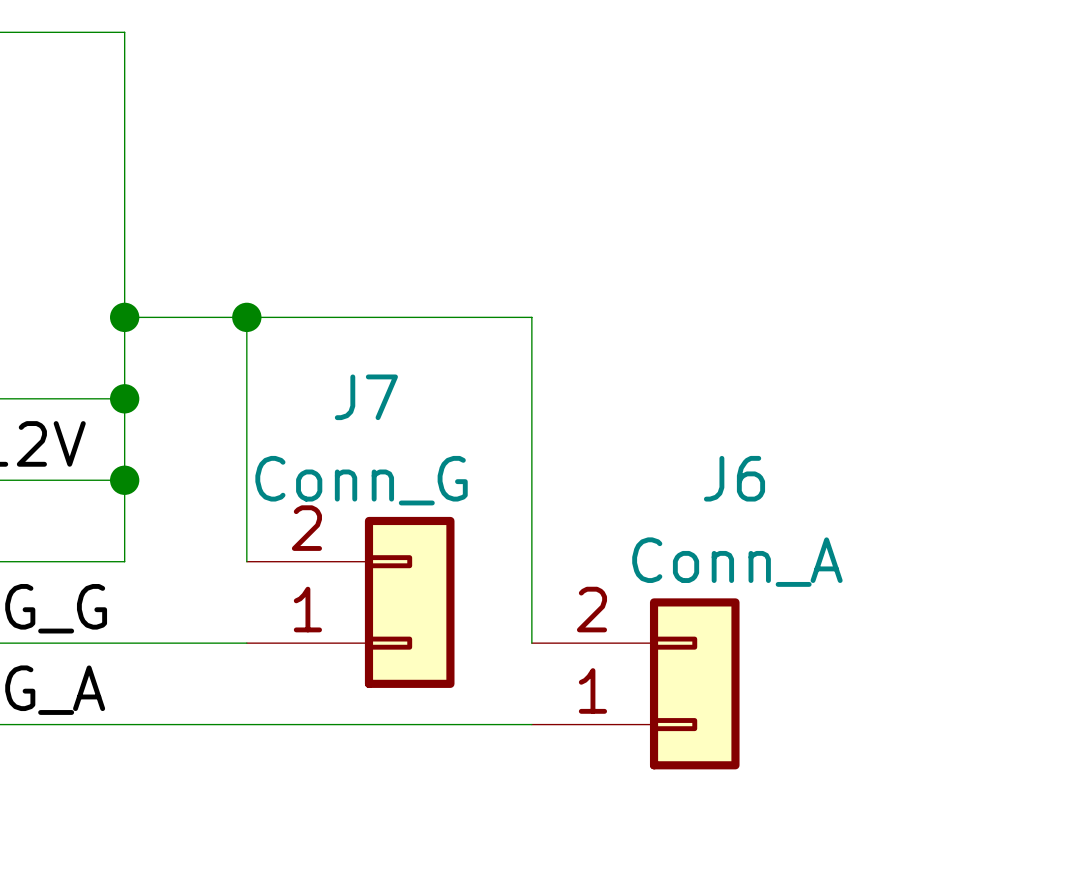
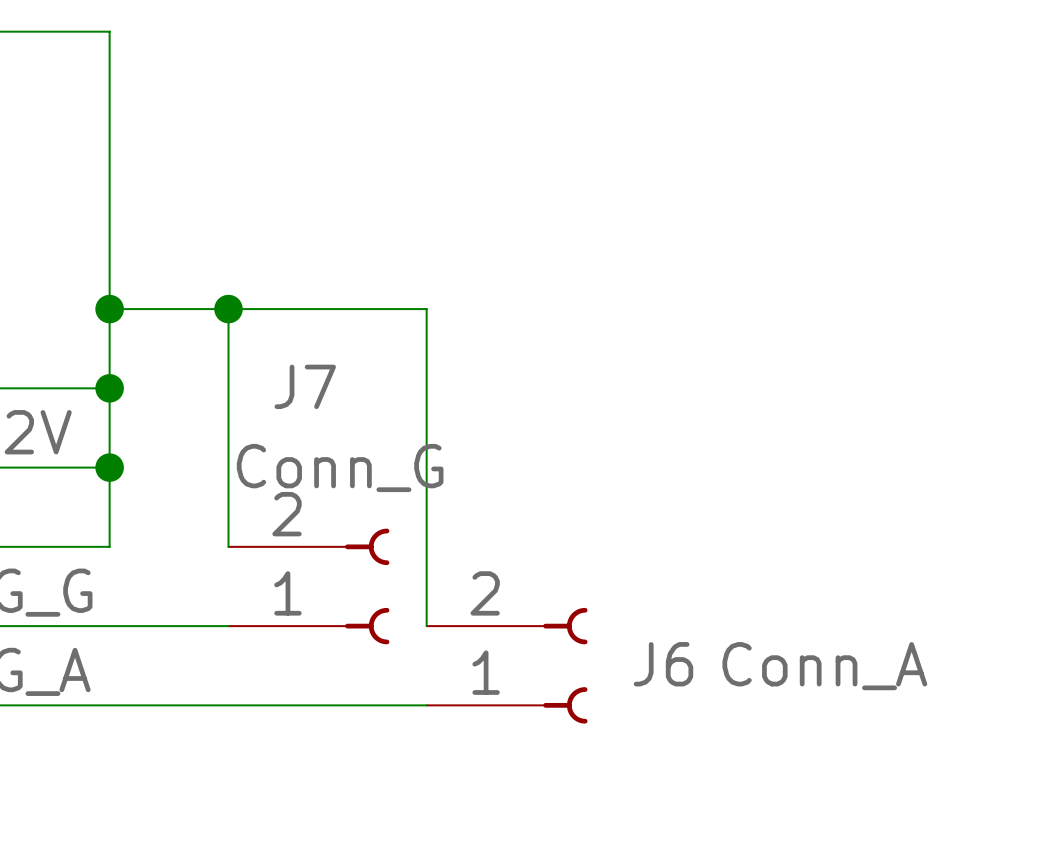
wire: (450, 317) (531, 317) (531, 643) -> (426, 309) (426, 626)
J6 name position: J6 (734, 478) -> J6 (663, 664)
J7 symbol: [246, 516, 455, 688] -> [228, 528, 390, 645]
J6 value position: Conn_A (737, 562) -> Conn_A (824, 666)
J6 symbol: [531, 598, 740, 770] -> [426, 607, 588, 724]

